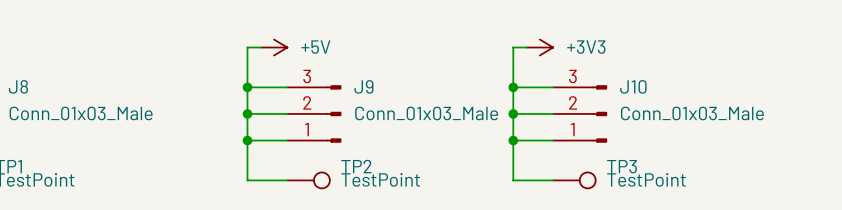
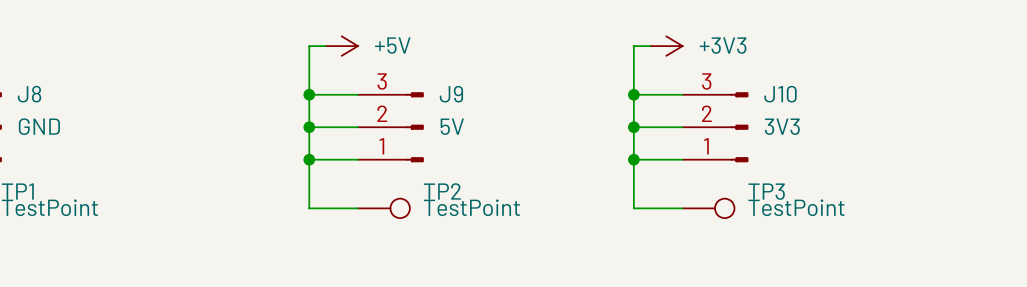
J8 value: Conn_01x03_Male (81, 113) -> GND (39, 126)
J9 value: Conn_01x03_Male (426, 113) -> 5V (452, 126)
J10 value: Conn_01x03_Male (692, 113) -> 3V3 (782, 126)

